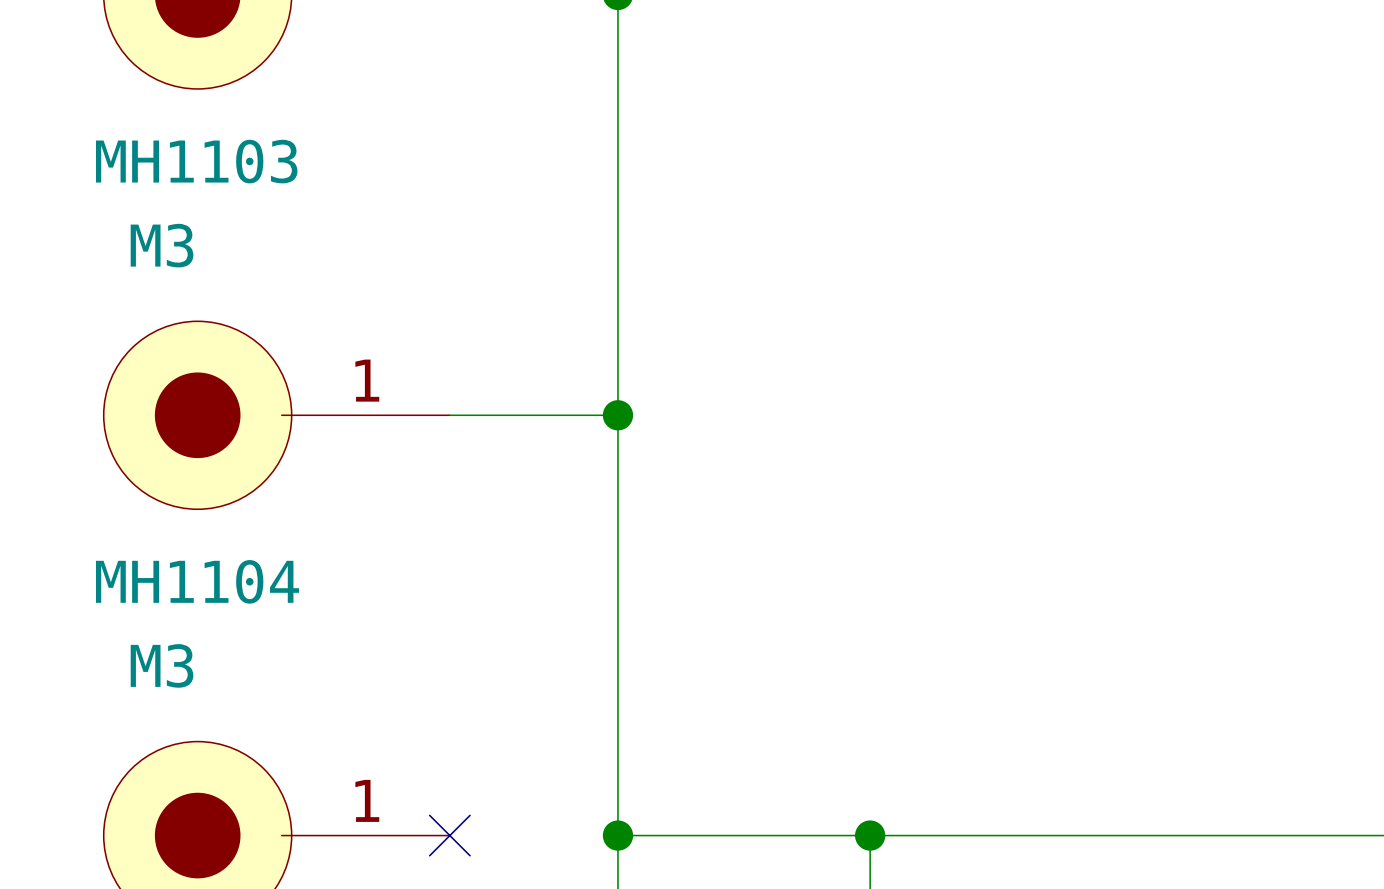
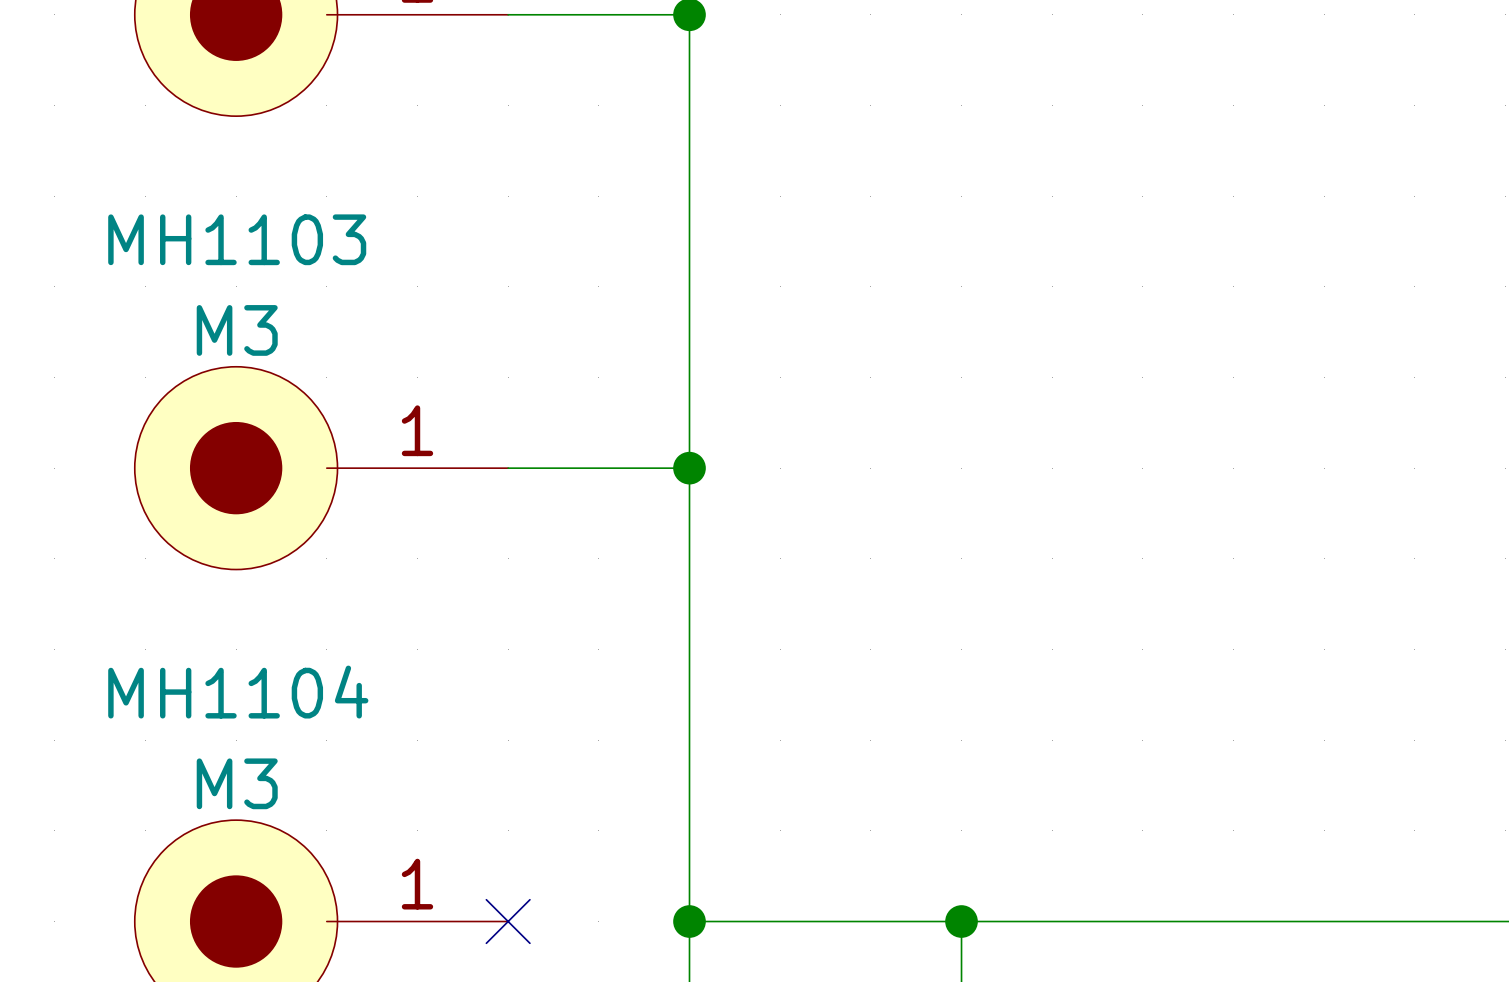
MH1103 name position: MH1103 (196, 161) -> MH1103 (237, 239)
MH1103 value position: M3 (162, 245) -> M3 (237, 330)
MH1104 name position: MH1104 (197, 581) -> MH1104 (238, 692)
MH1104 value position: M3 (162, 665) -> M3 (237, 783)

